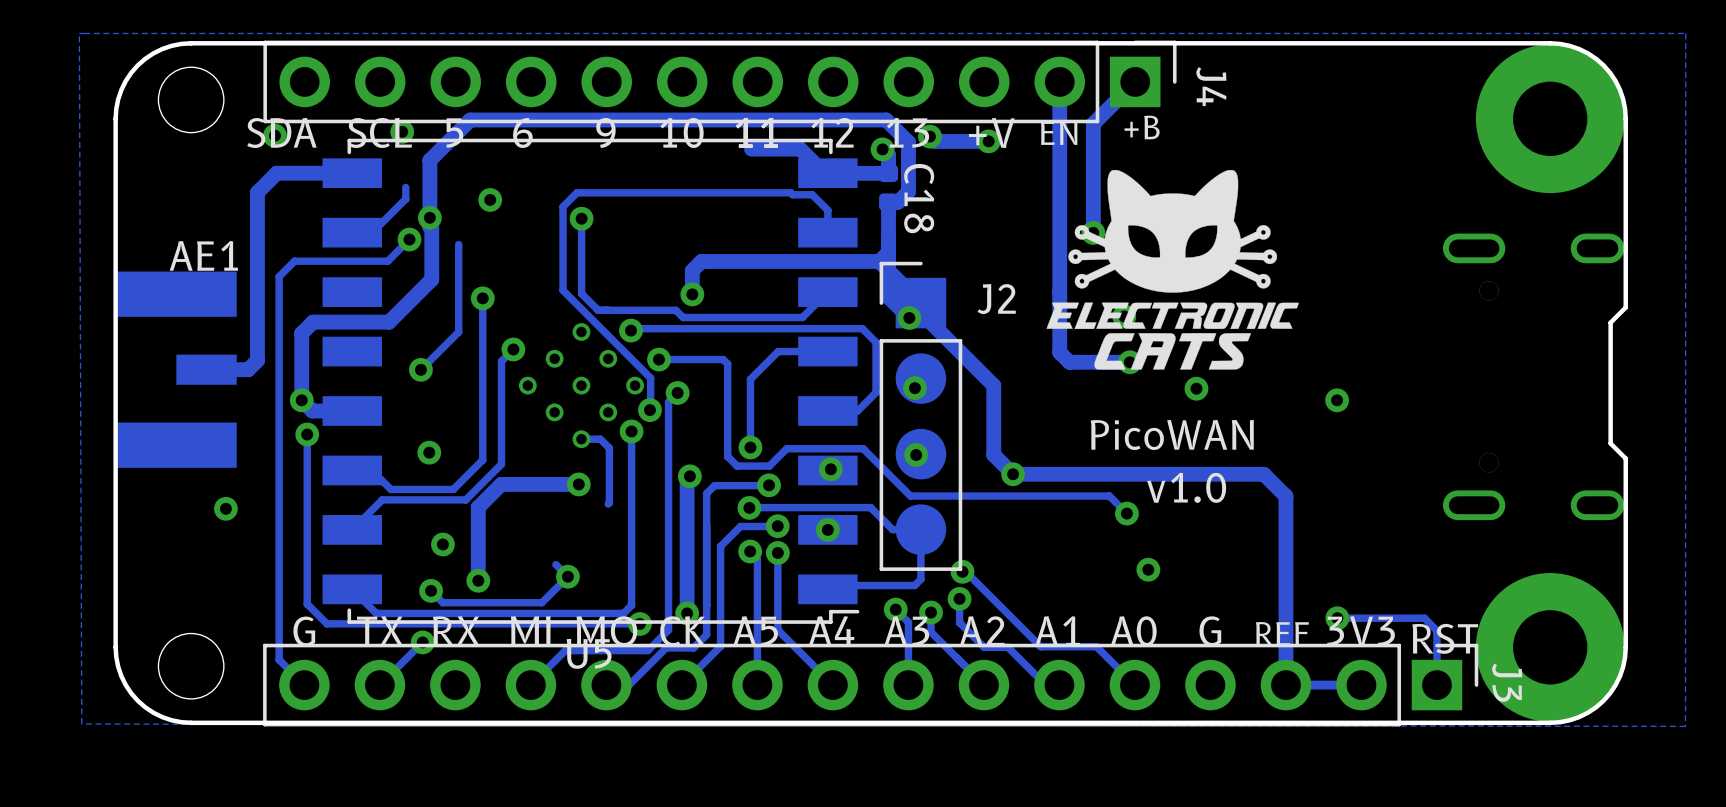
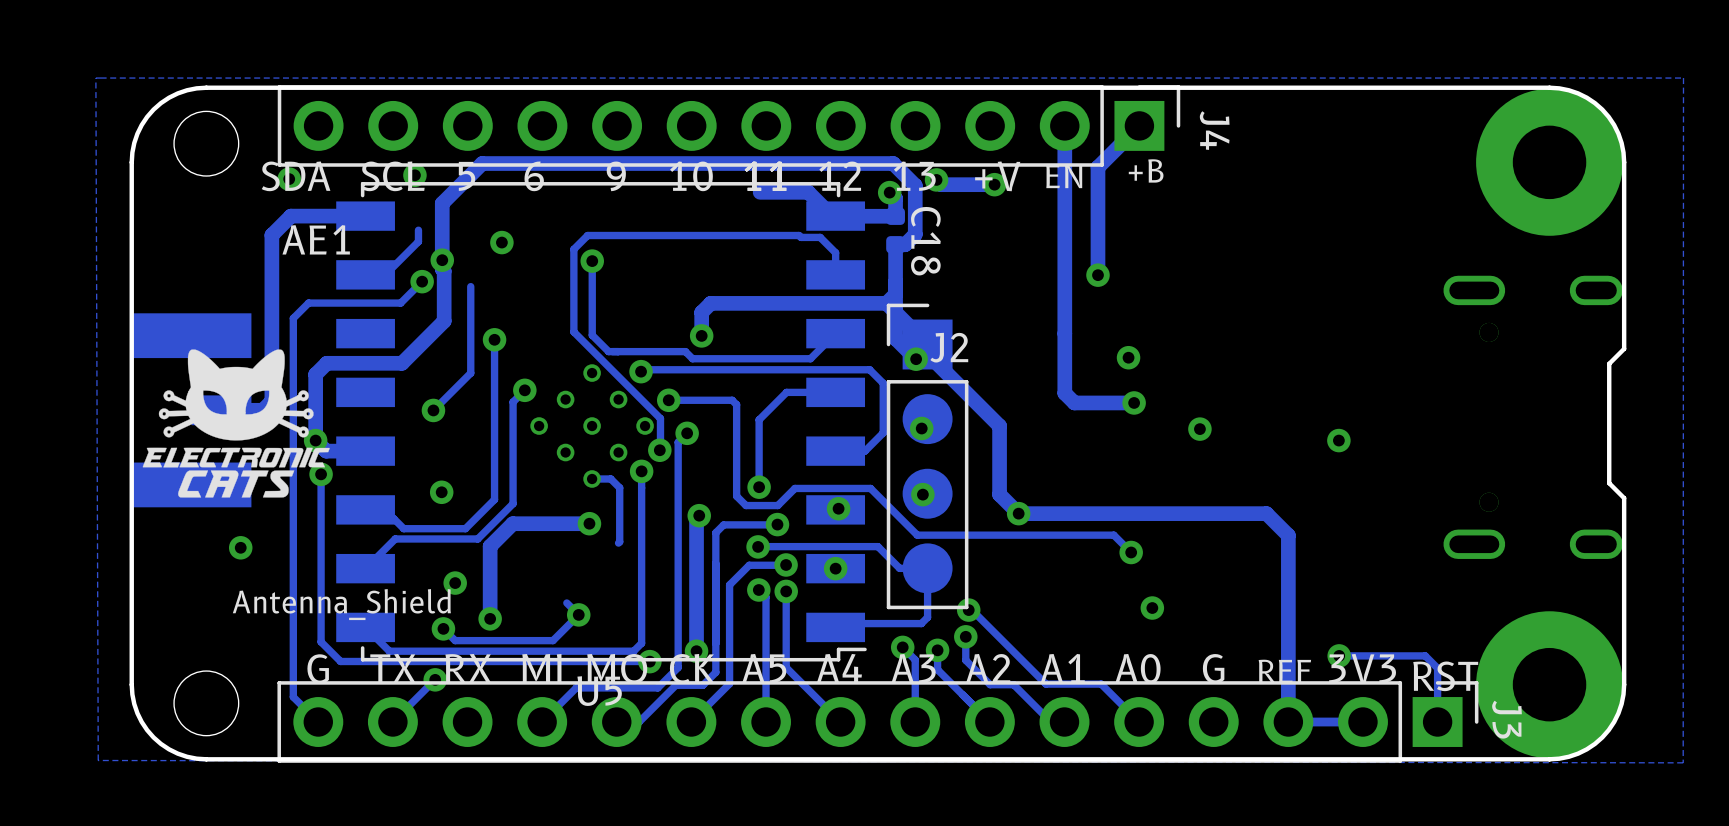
drawing: [1046, 170, 1299, 370] -> none
AE1 name position: AE1 (203, 255) -> AE1 (316, 239)
J2 name position: J2 (996, 299) -> J2 (949, 347)
drawing: none -> [142, 349, 330, 498]
text: PicoWAN (1172, 434) -> none
text: v1.0 (1186, 487) -> none
AE1 value: none -> Antenna_Shield (341, 604)

